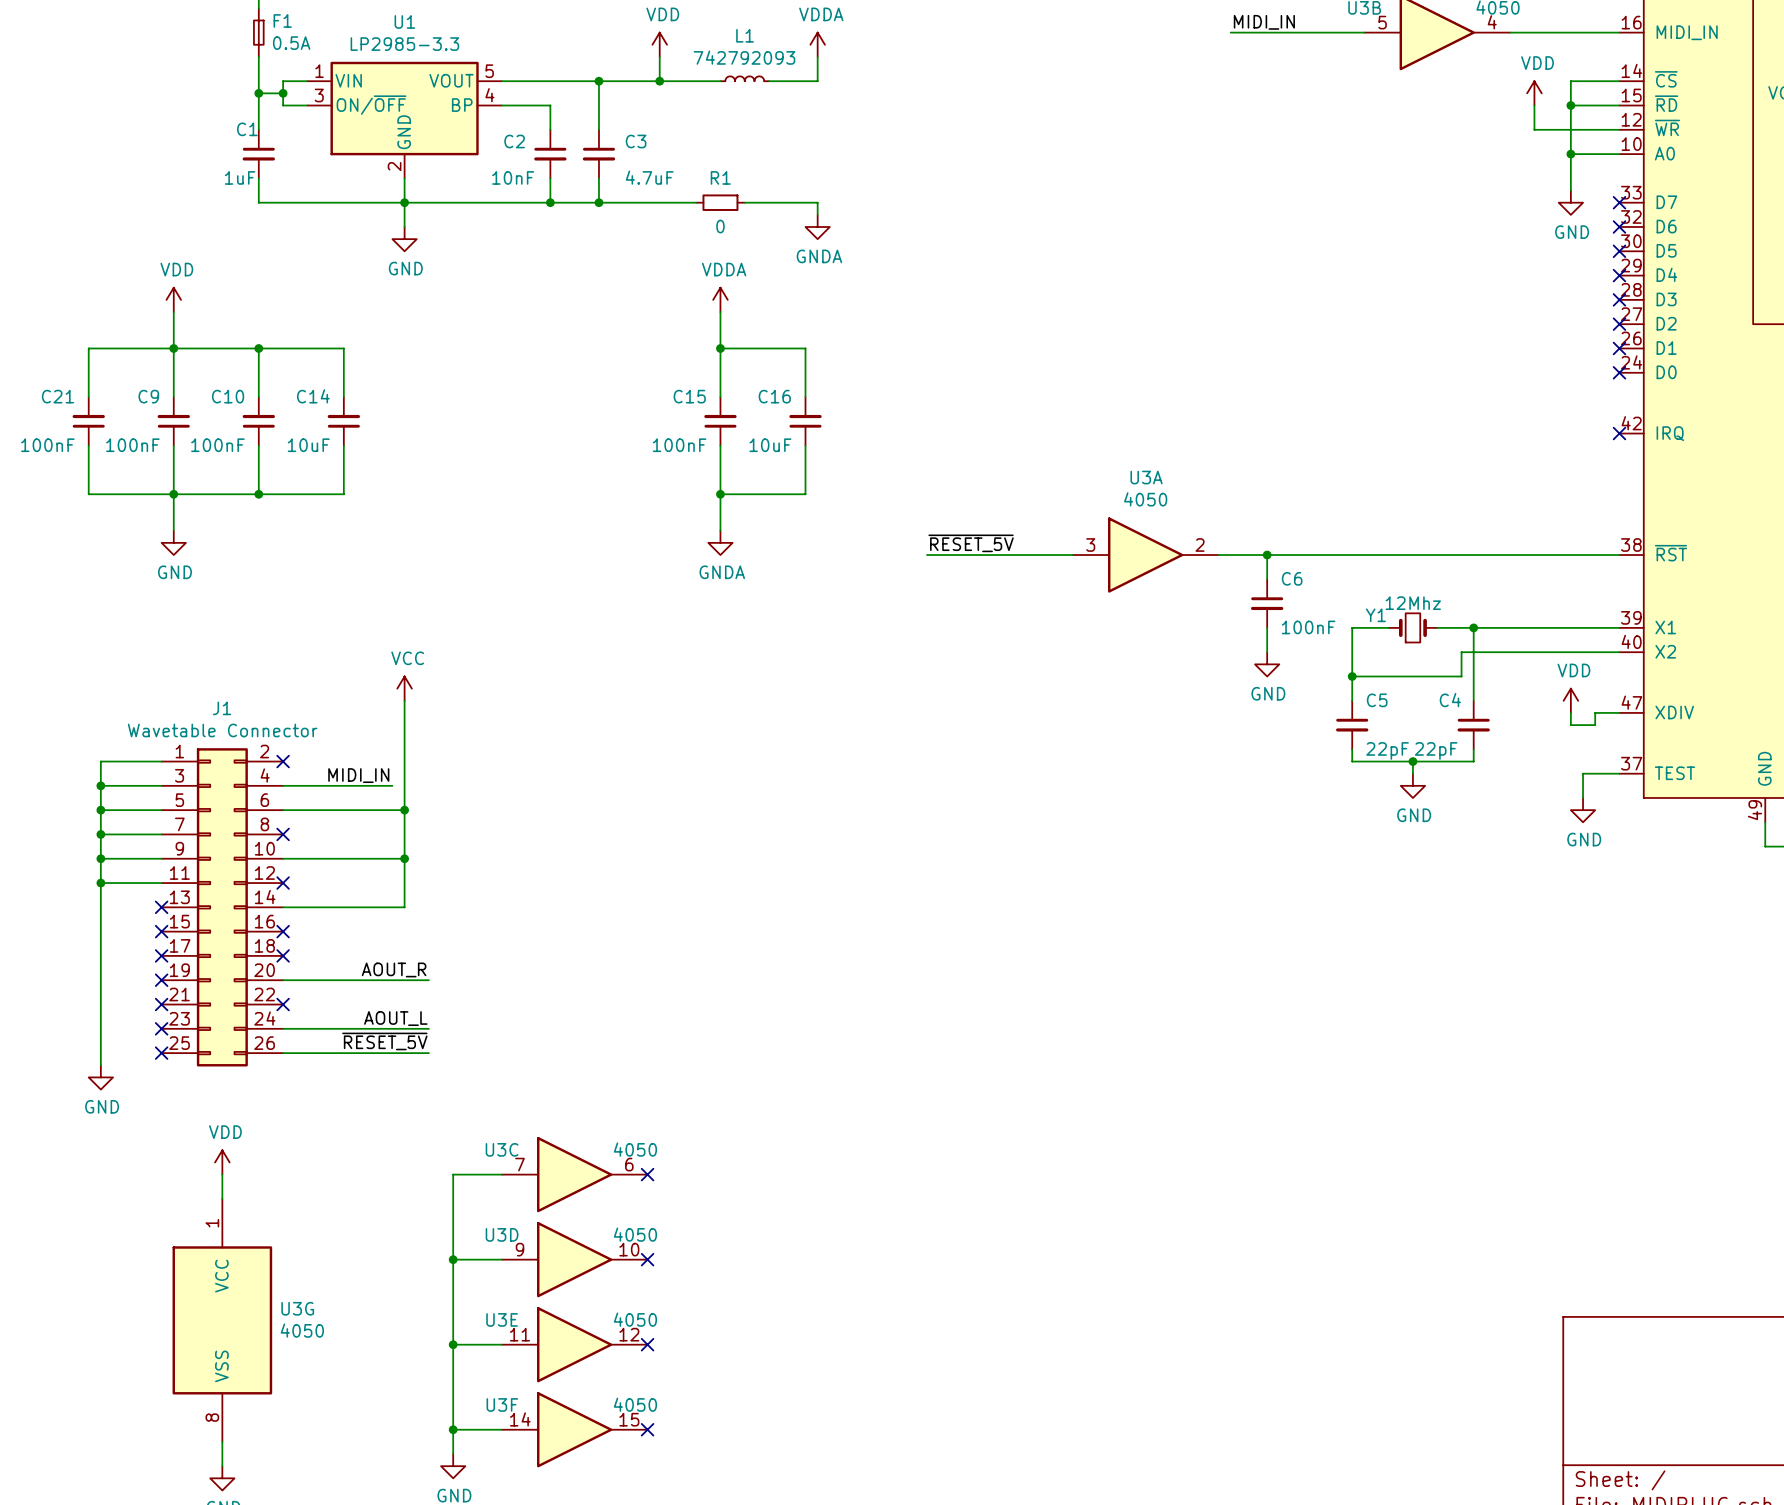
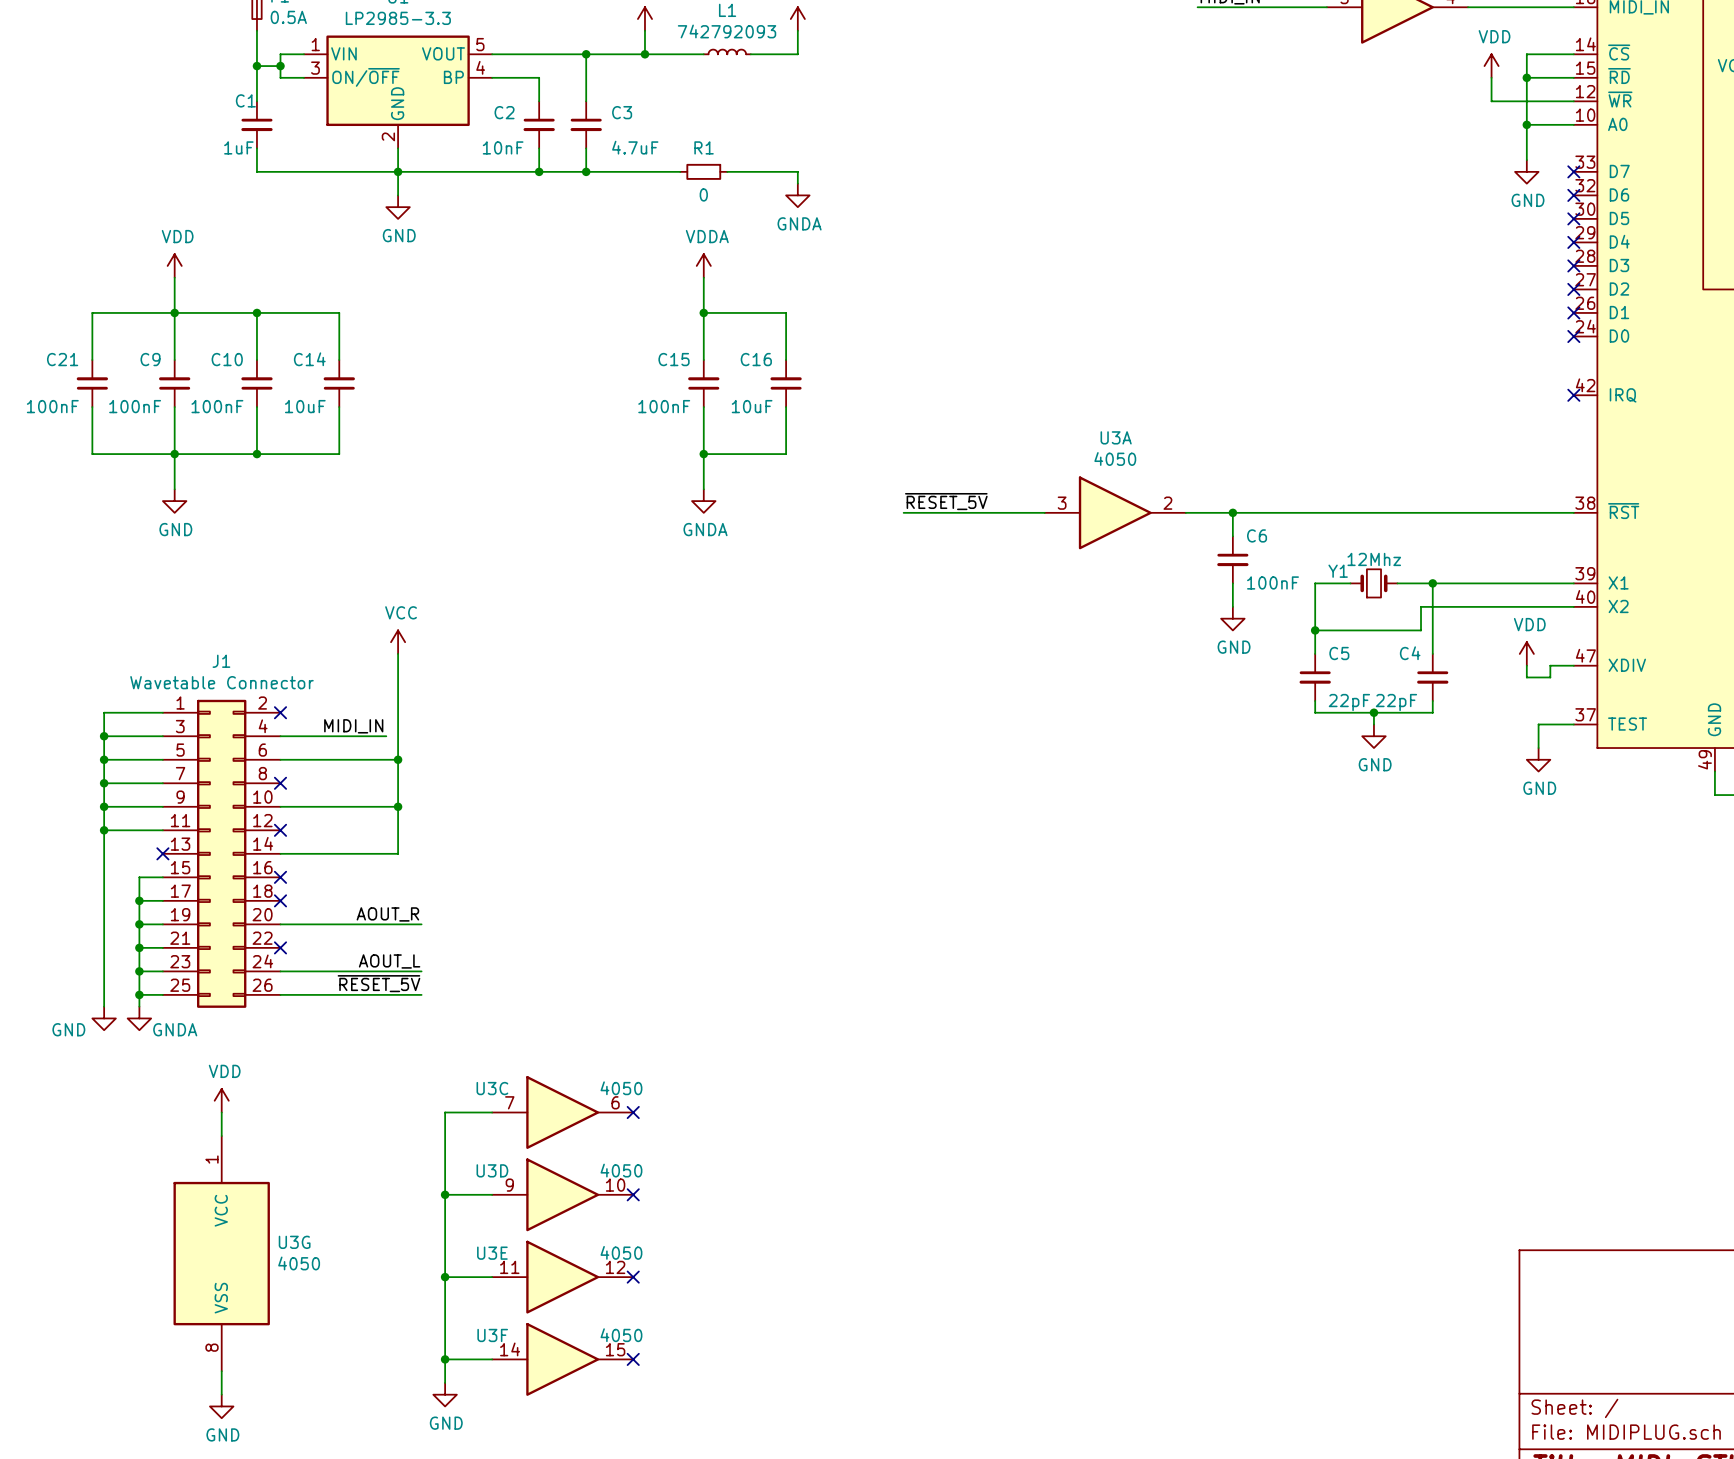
wire: none -> (162, 877) (139, 877) (139, 1006)
no-connect mark: (161, 931) -> none
wire: none -> (139, 900) (162, 900)
junction: none -> (139, 900)
no-connect mark: (161, 955) -> none
wire: none -> (139, 924) (162, 924)
junction: none -> (139, 924)
no-connect mark: (161, 980) -> none
wire: none -> (139, 947) (162, 947)
junction: none -> (139, 947)
no-connect mark: (161, 1004) -> none
wire: none -> (139, 971) (162, 971)
junction: none -> (139, 971)
no-connect mark: (161, 1028) -> none
wire: none -> (139, 994) (162, 994)
junction: none -> (139, 994)
no-connect mark: (161, 1053) -> none
power symbol: none -> GNDA (139, 1018)
power symbol text position: GND (102, 1106) -> GND (68, 1029)

